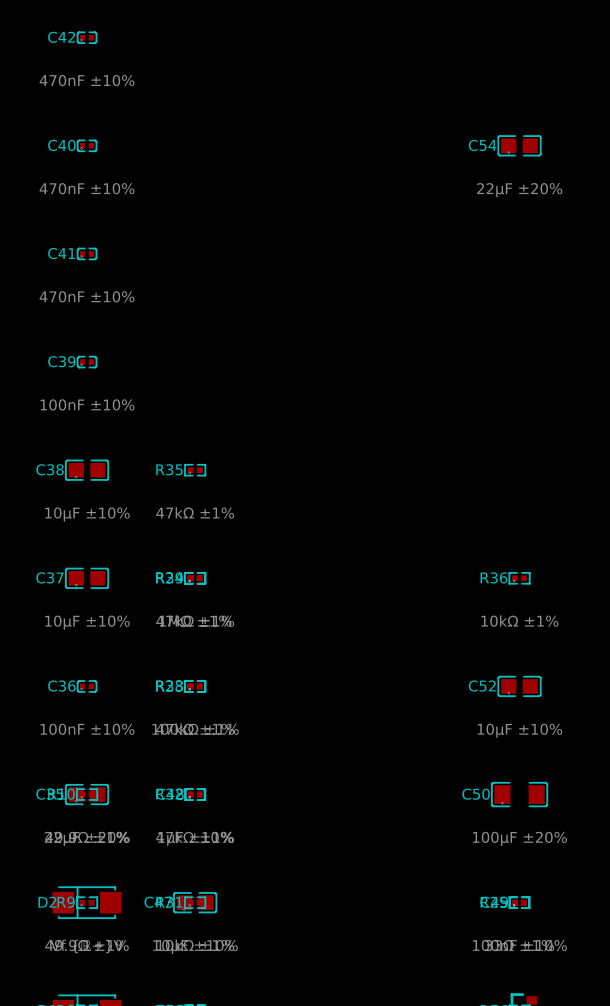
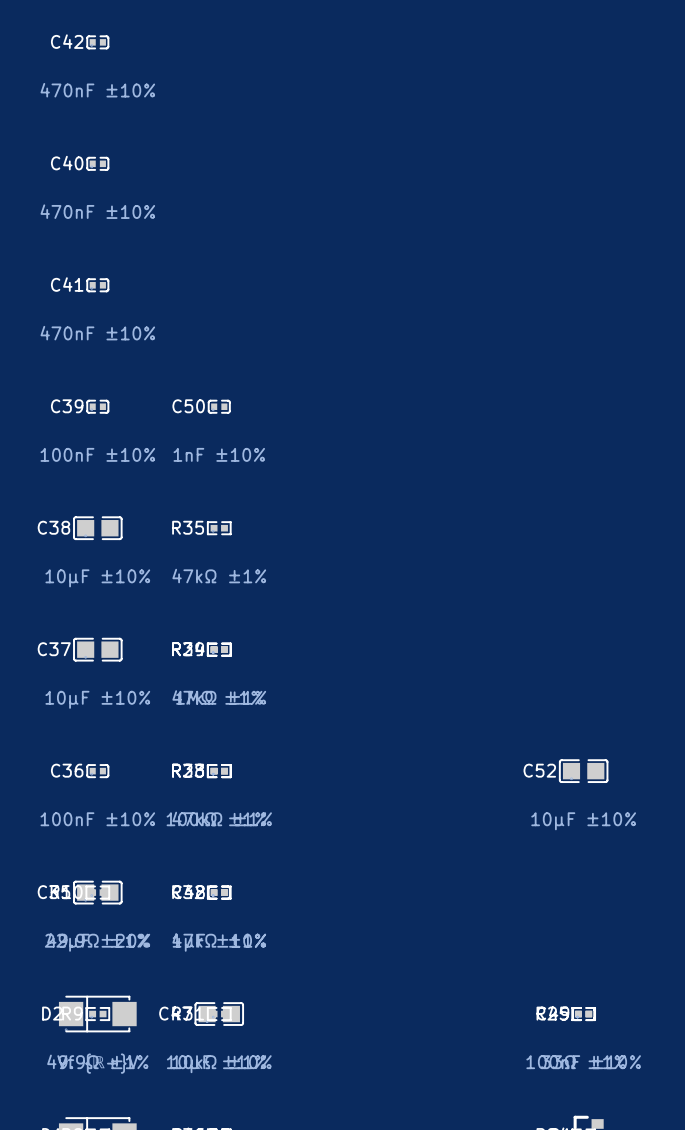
C54: 22µF ±20% (519, 145) -> none
R36: 10kΩ ±1% (519, 578) -> none
C50 footprint: [491, 781, 549, 808] -> [207, 399, 231, 414]
C50 value: 100µF ±20% (519, 838) -> 1nF ±10% (219, 454)

